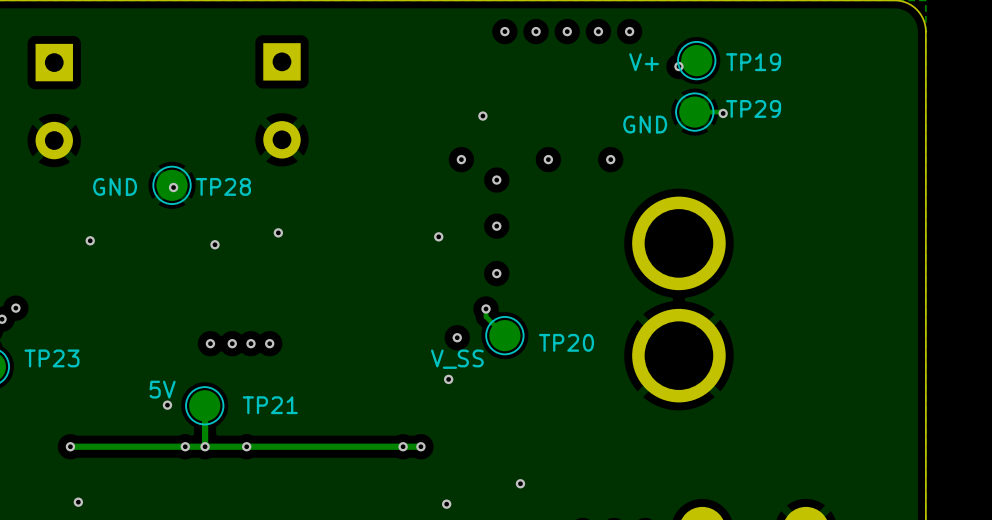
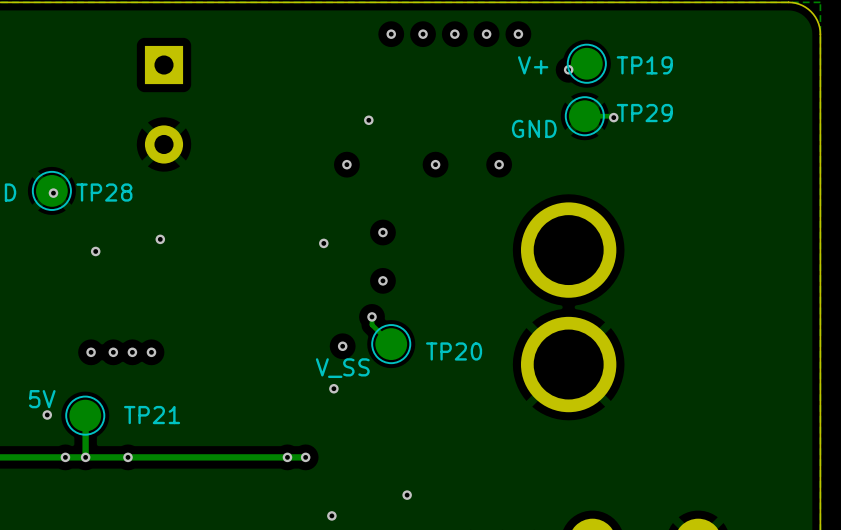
via: (496, 180) -> none

